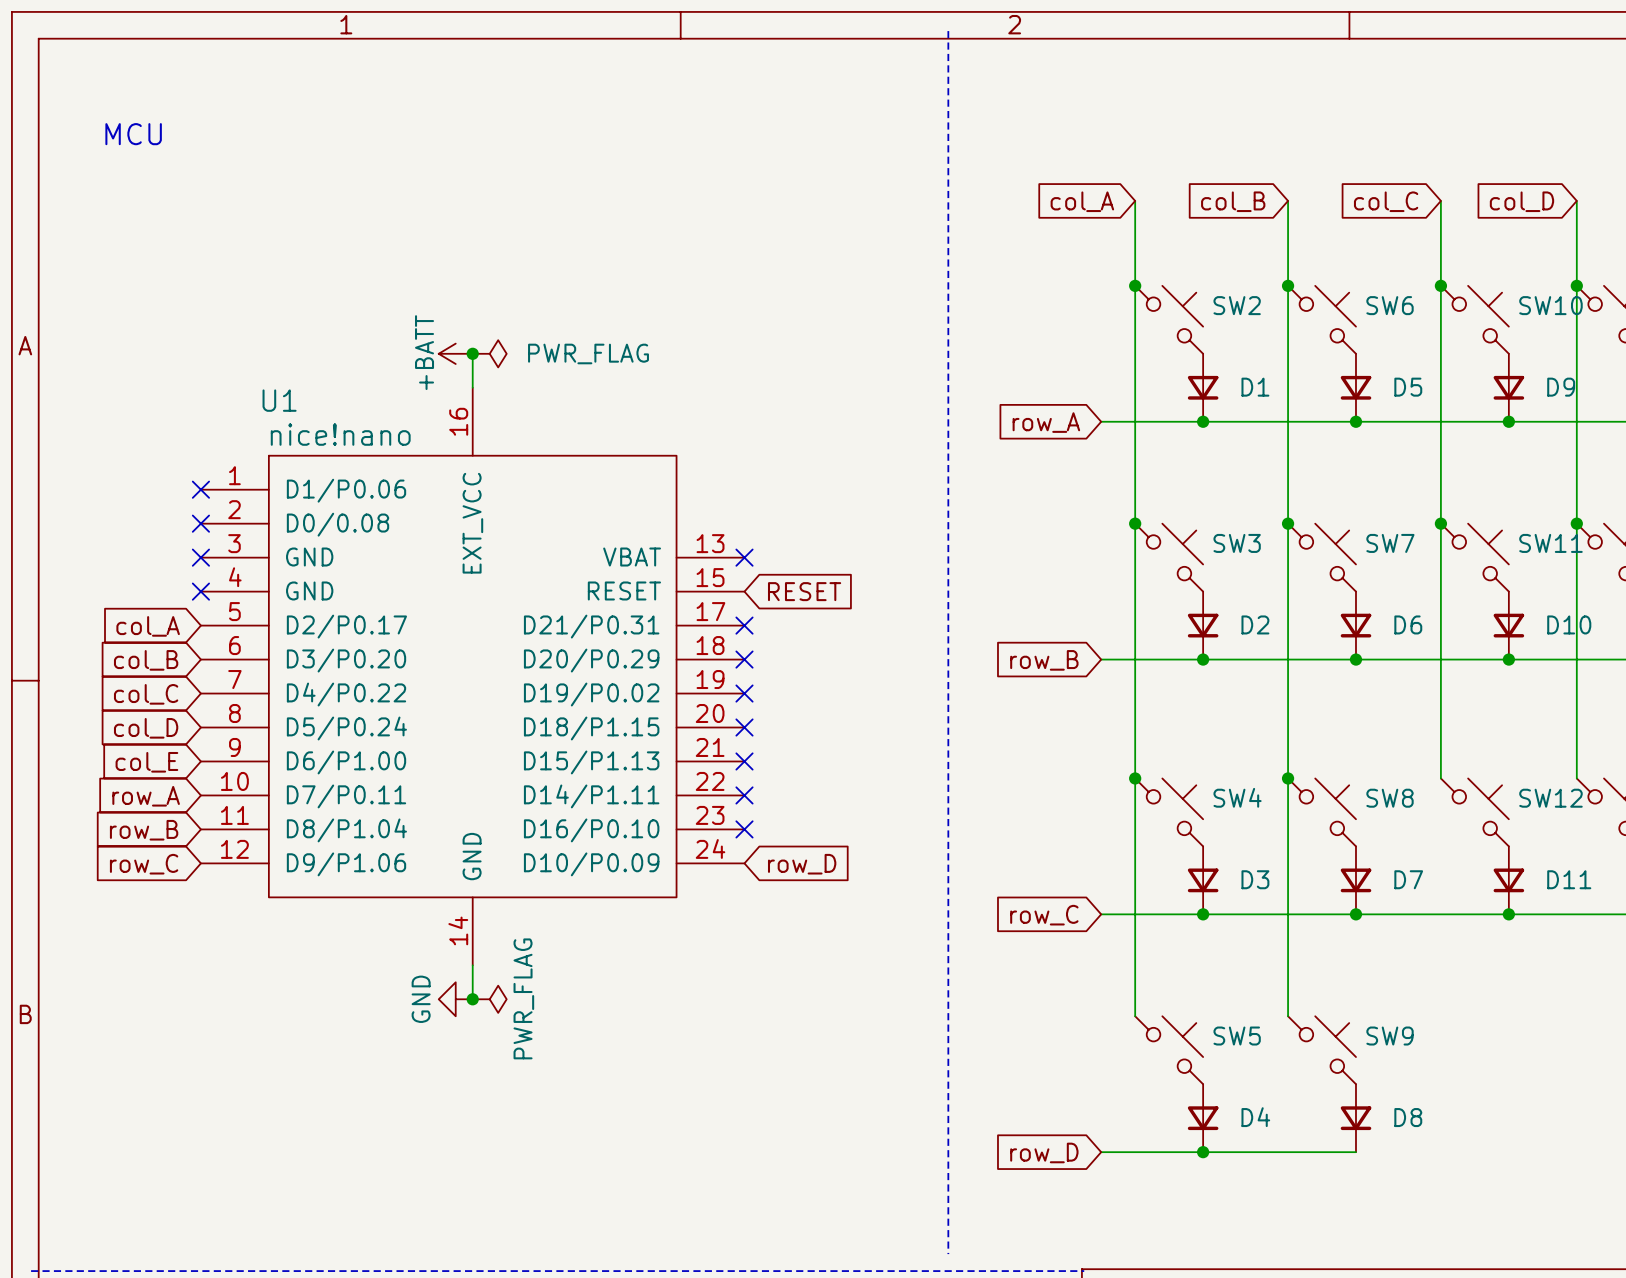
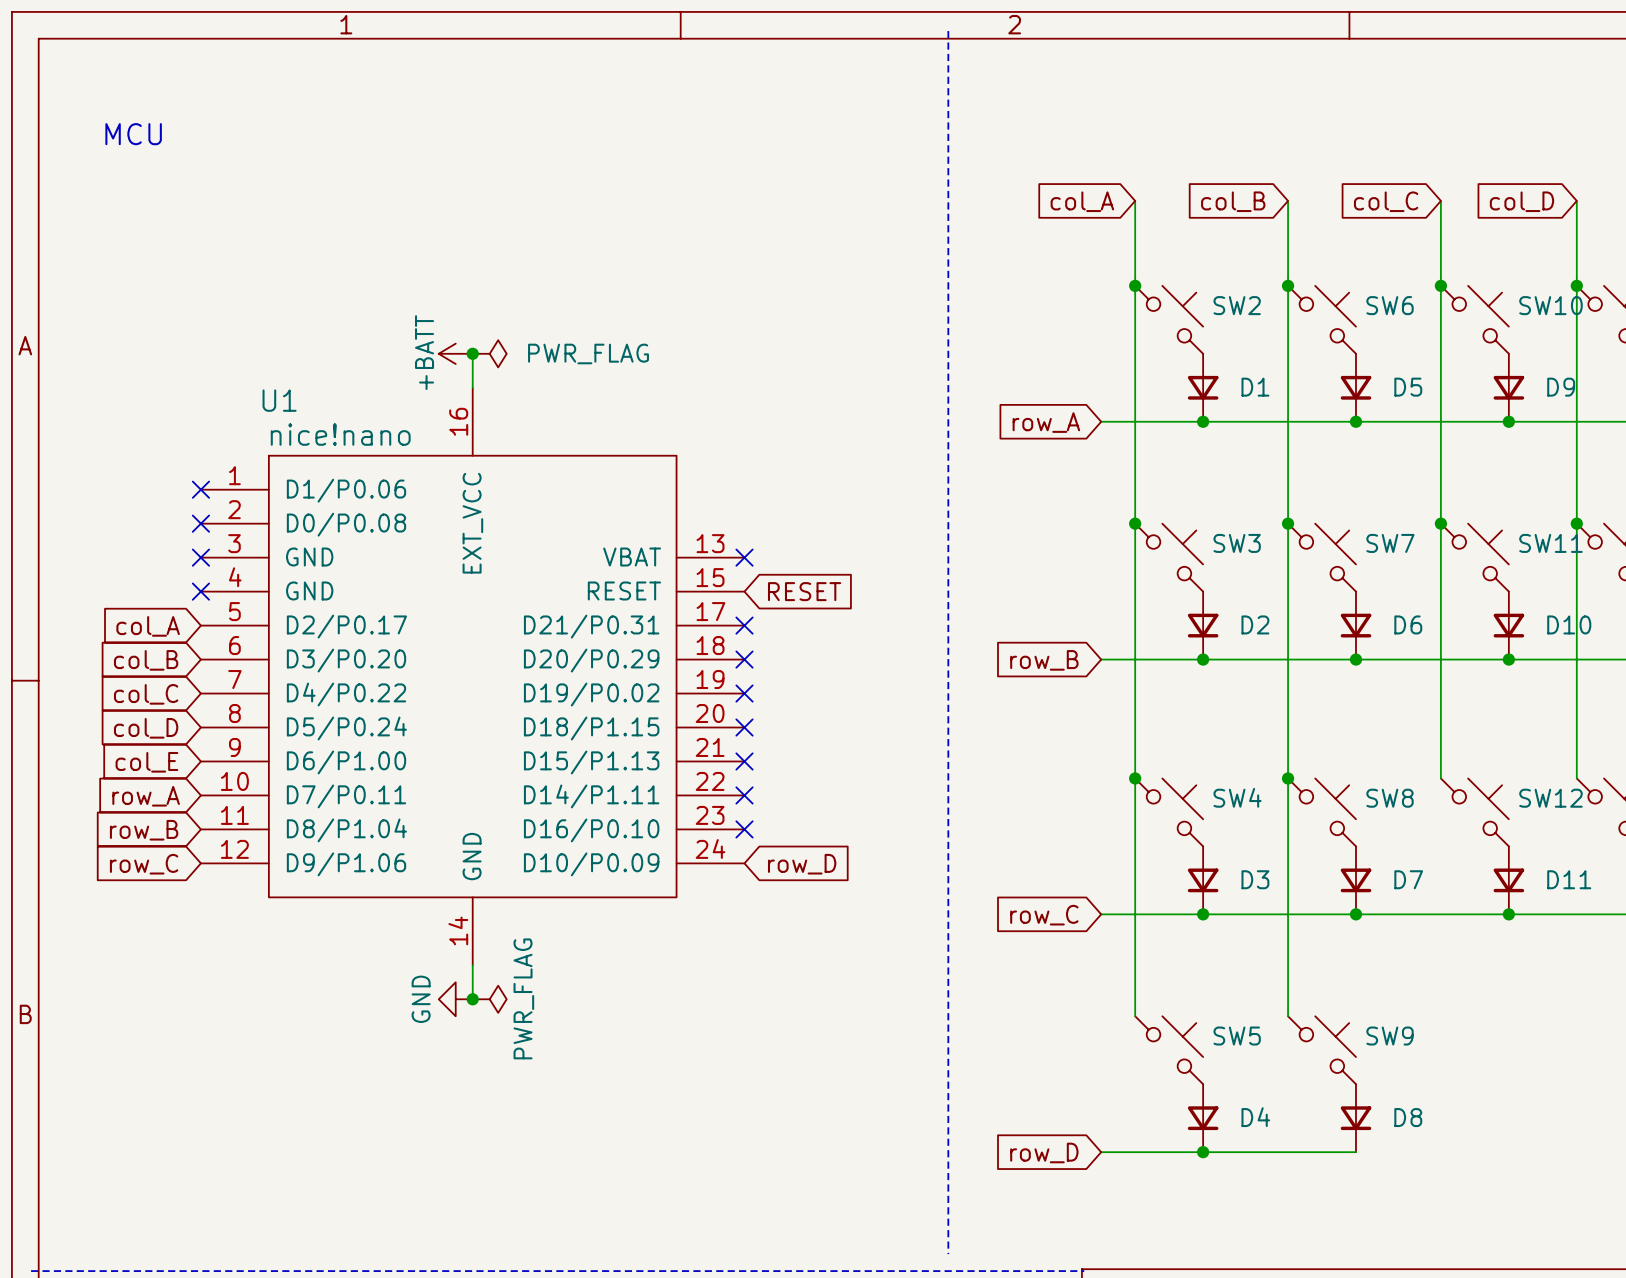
U1 pin name: D0/0.08 (338, 524) -> D0/P0.08 (346, 524)

